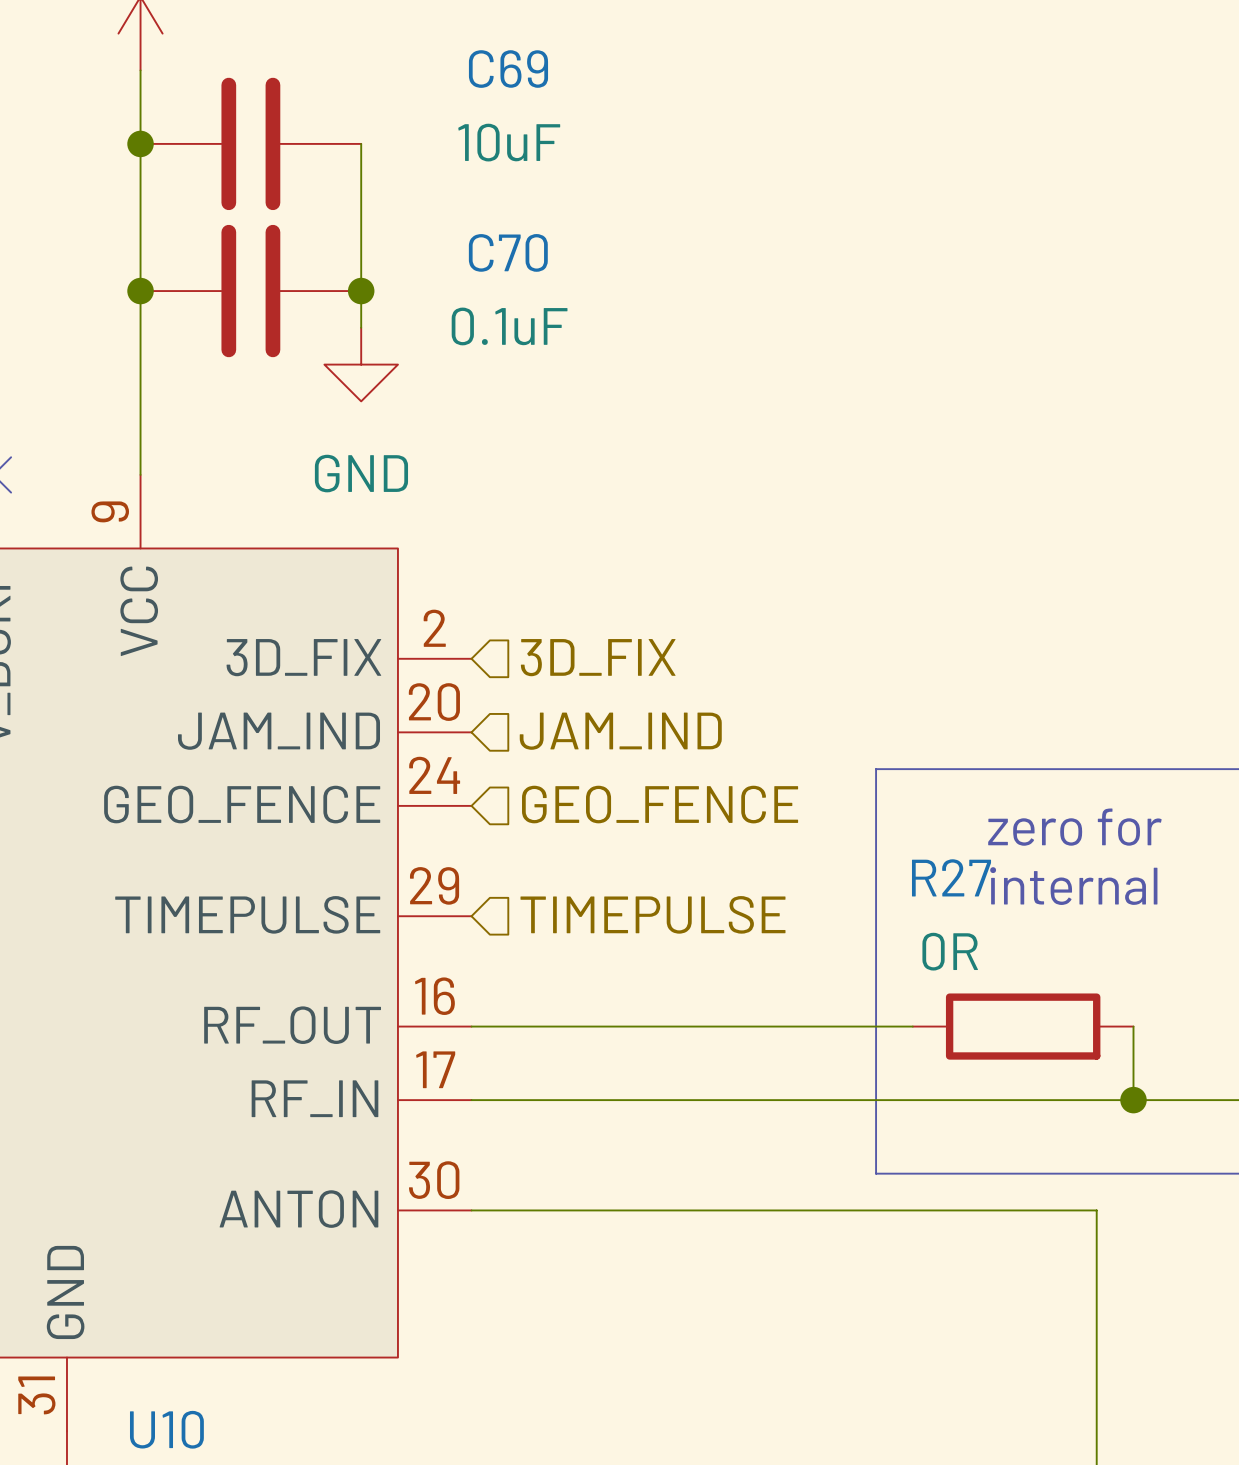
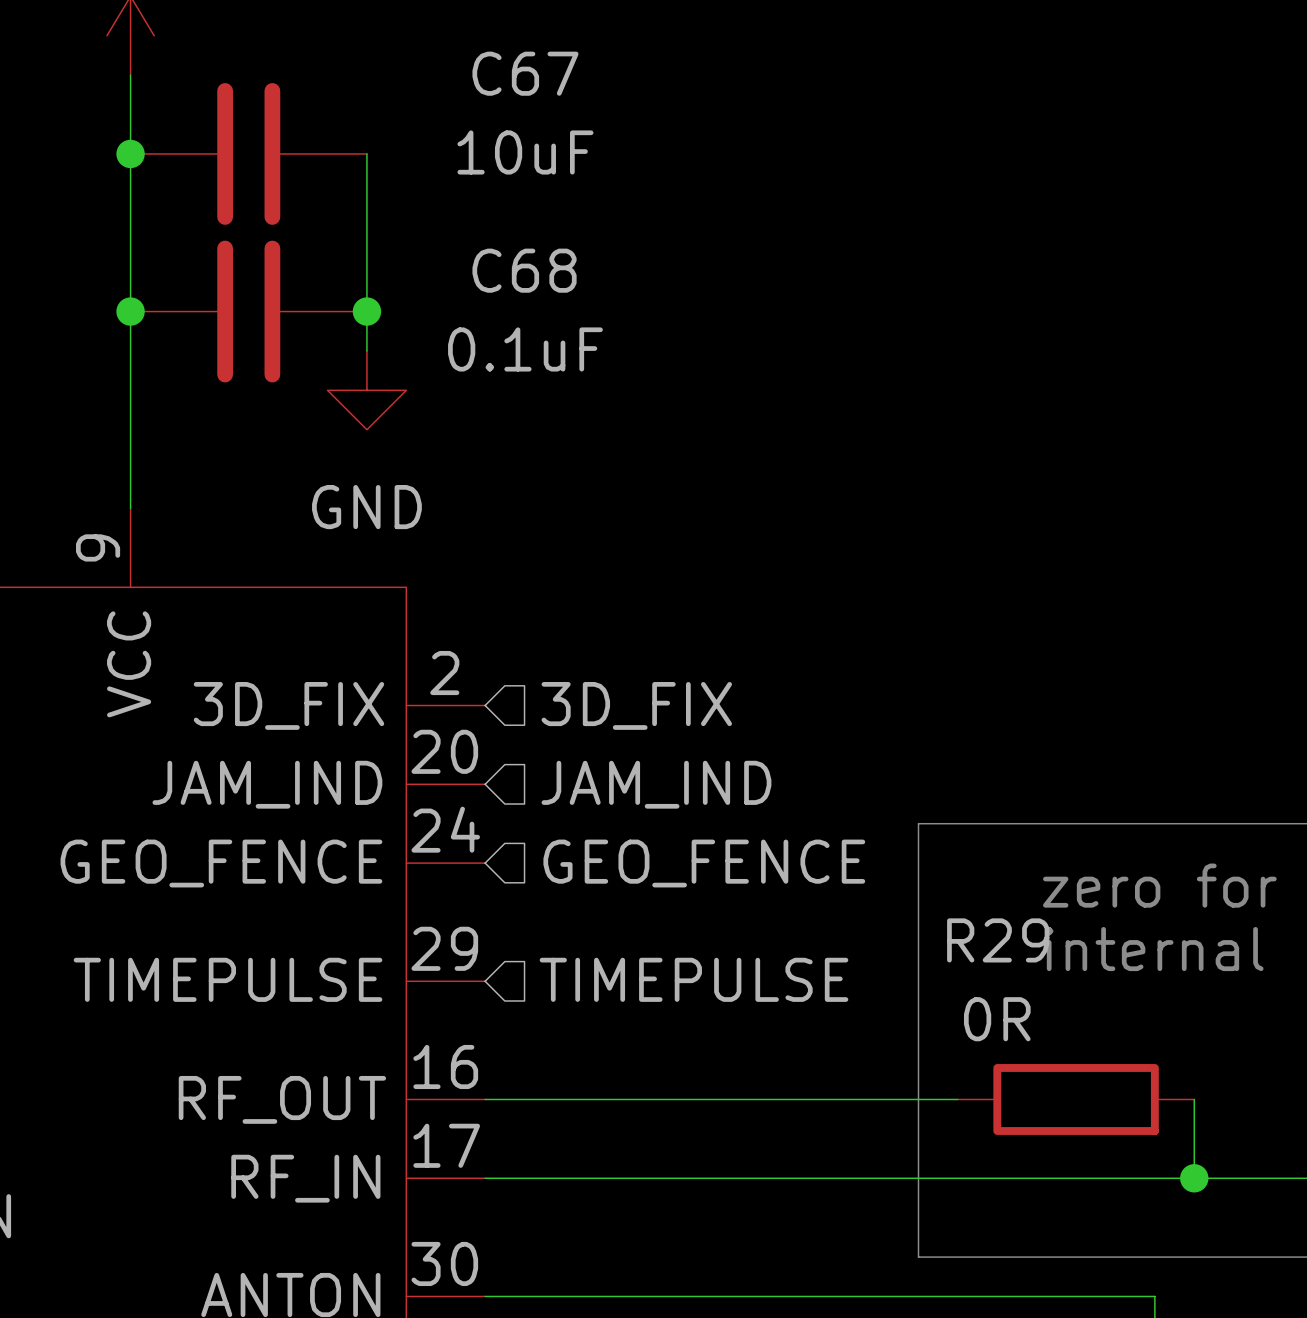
C69 name: C69 (508, 69) -> C67 (525, 73)
C70 name: C70 (508, 252) -> C68 (524, 270)
R27 name: R27 (951, 877) -> R29 (998, 940)

